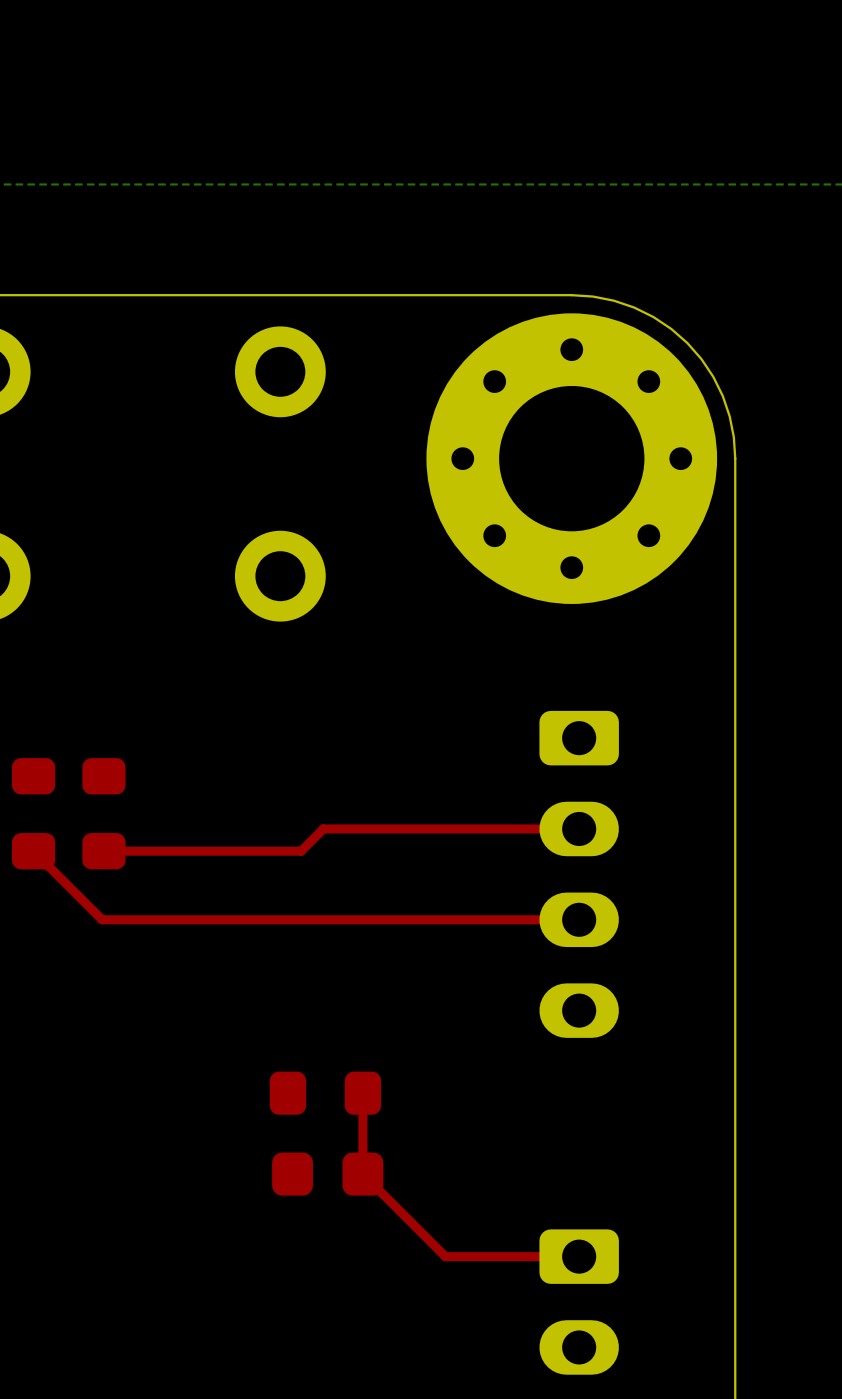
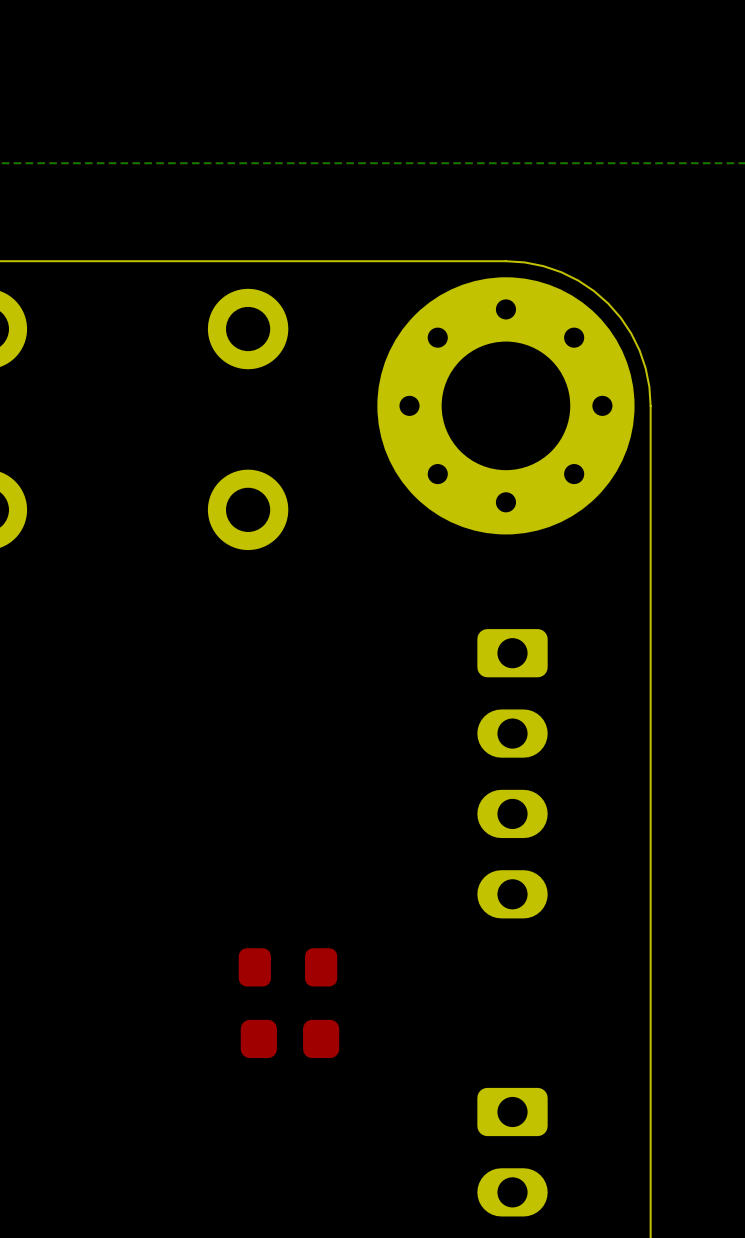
part: (33, 813) -> none
part: (103, 813) -> none
top track: (579, 828) (323, 828) (301, 851) (103, 851) -> none
top track: (33, 851) (102, 919) (579, 919) -> none
top track: (362, 1093) (362, 1174) (445, 1256) (579, 1256) -> none

